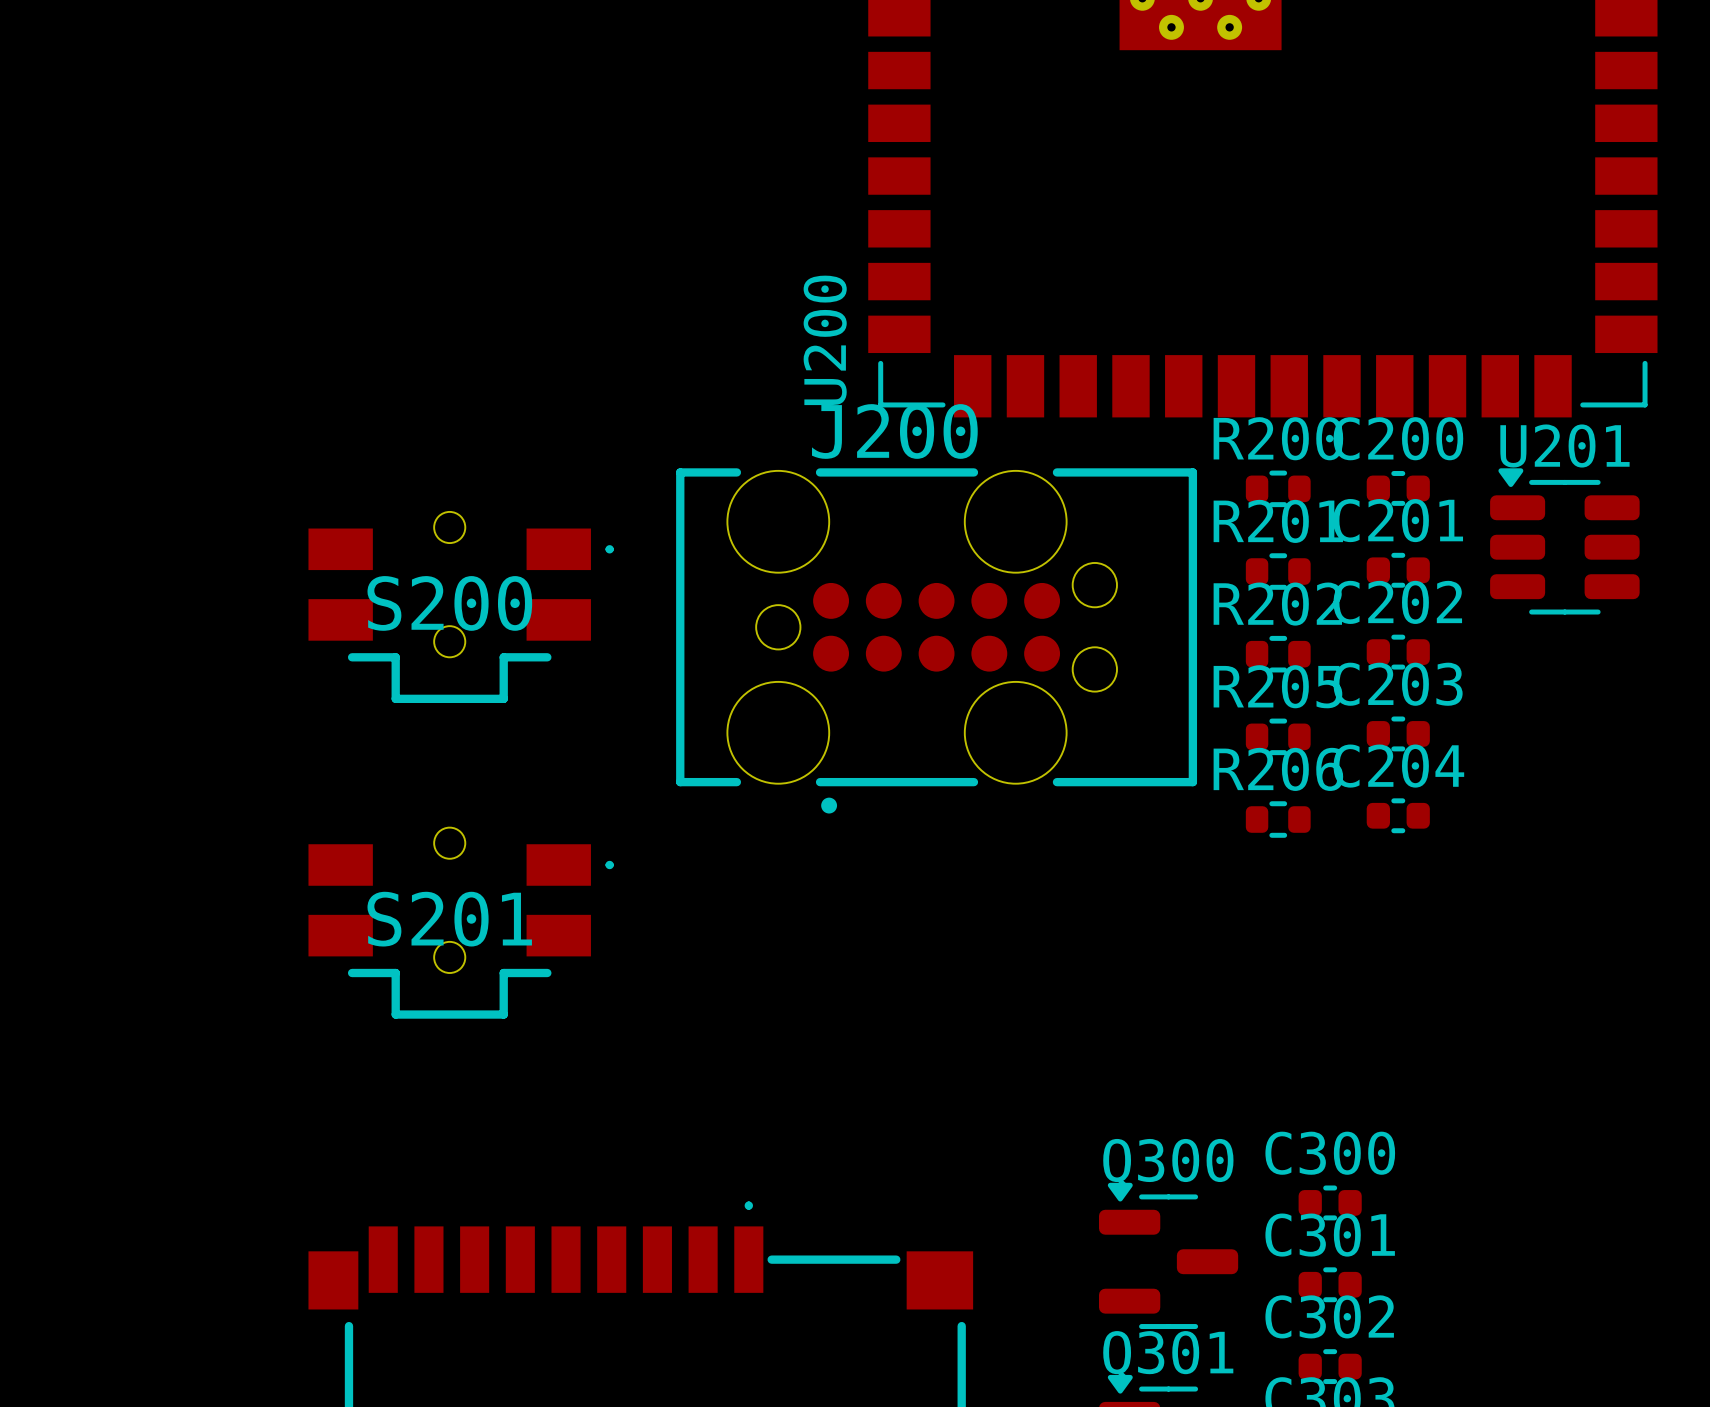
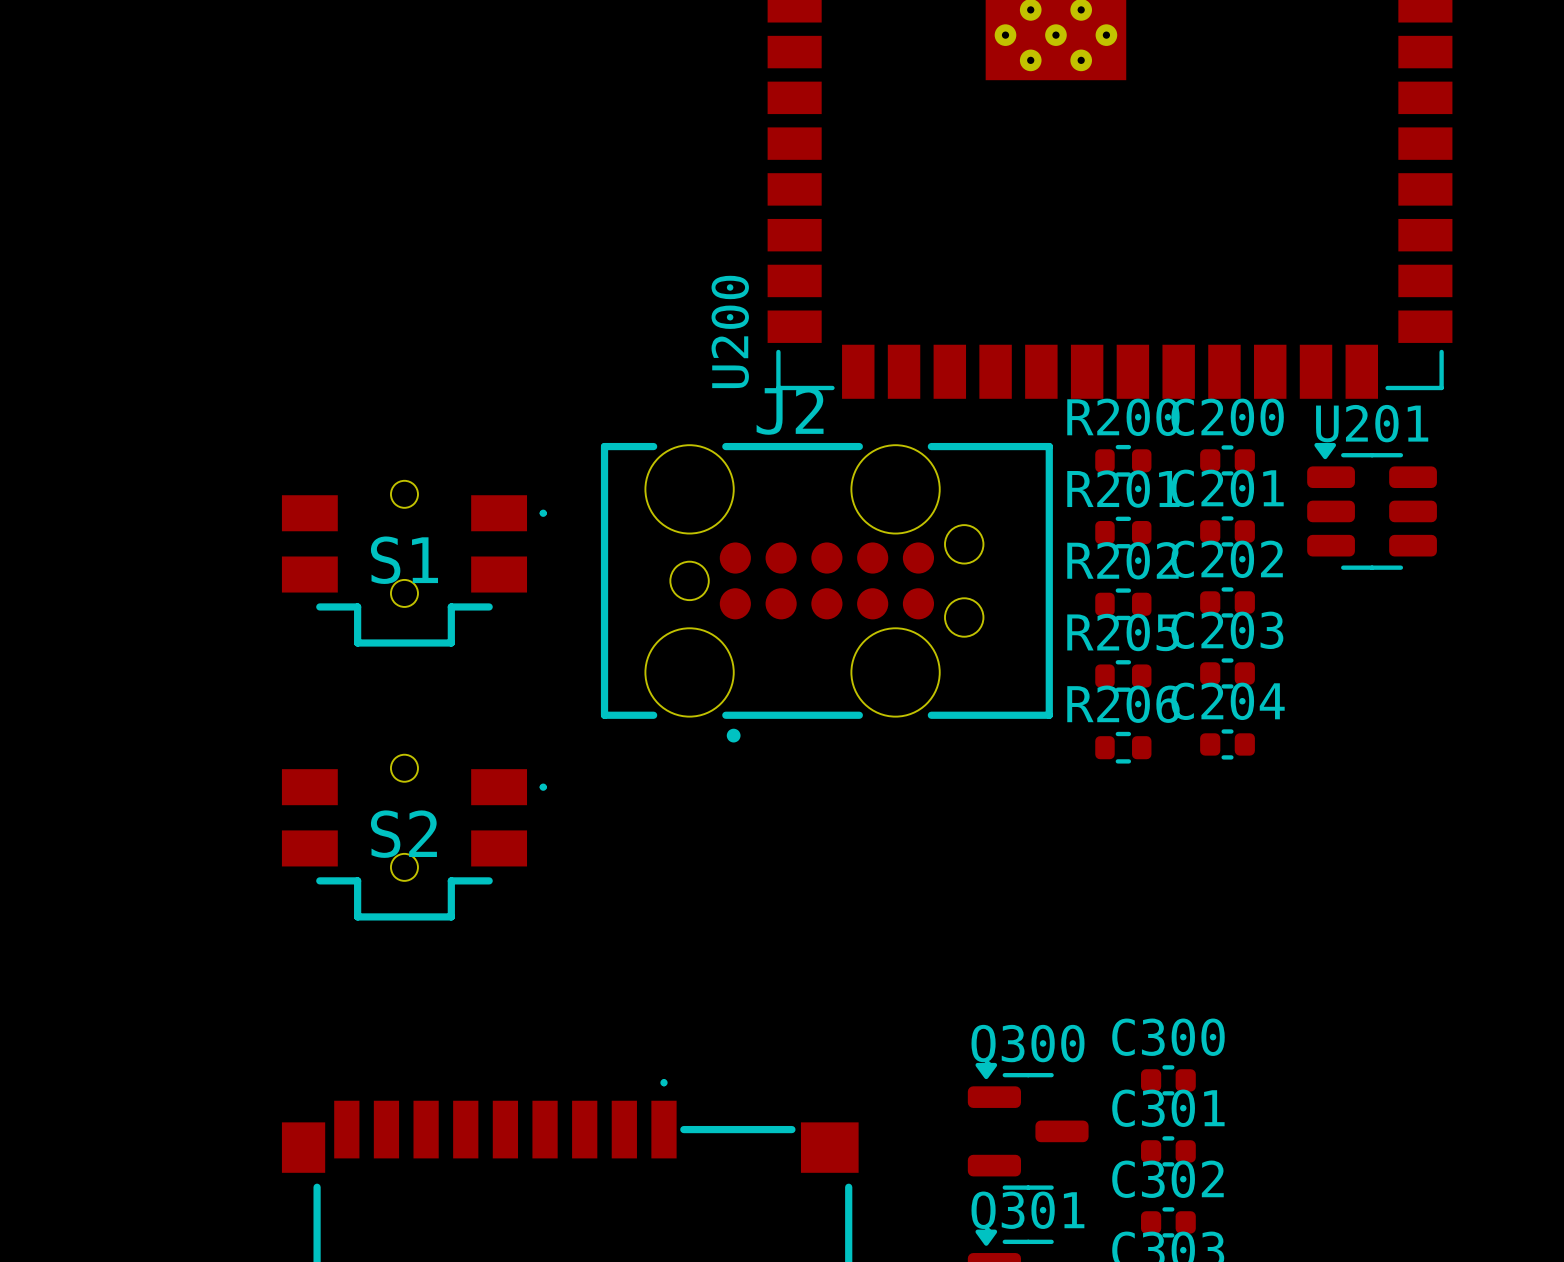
J200 name: J200 (894, 431) -> J2 (790, 411)
S200 name: S200 (449, 603) -> S1 (404, 560)
S201 name: S201 (449, 919) -> S2 (403, 834)

